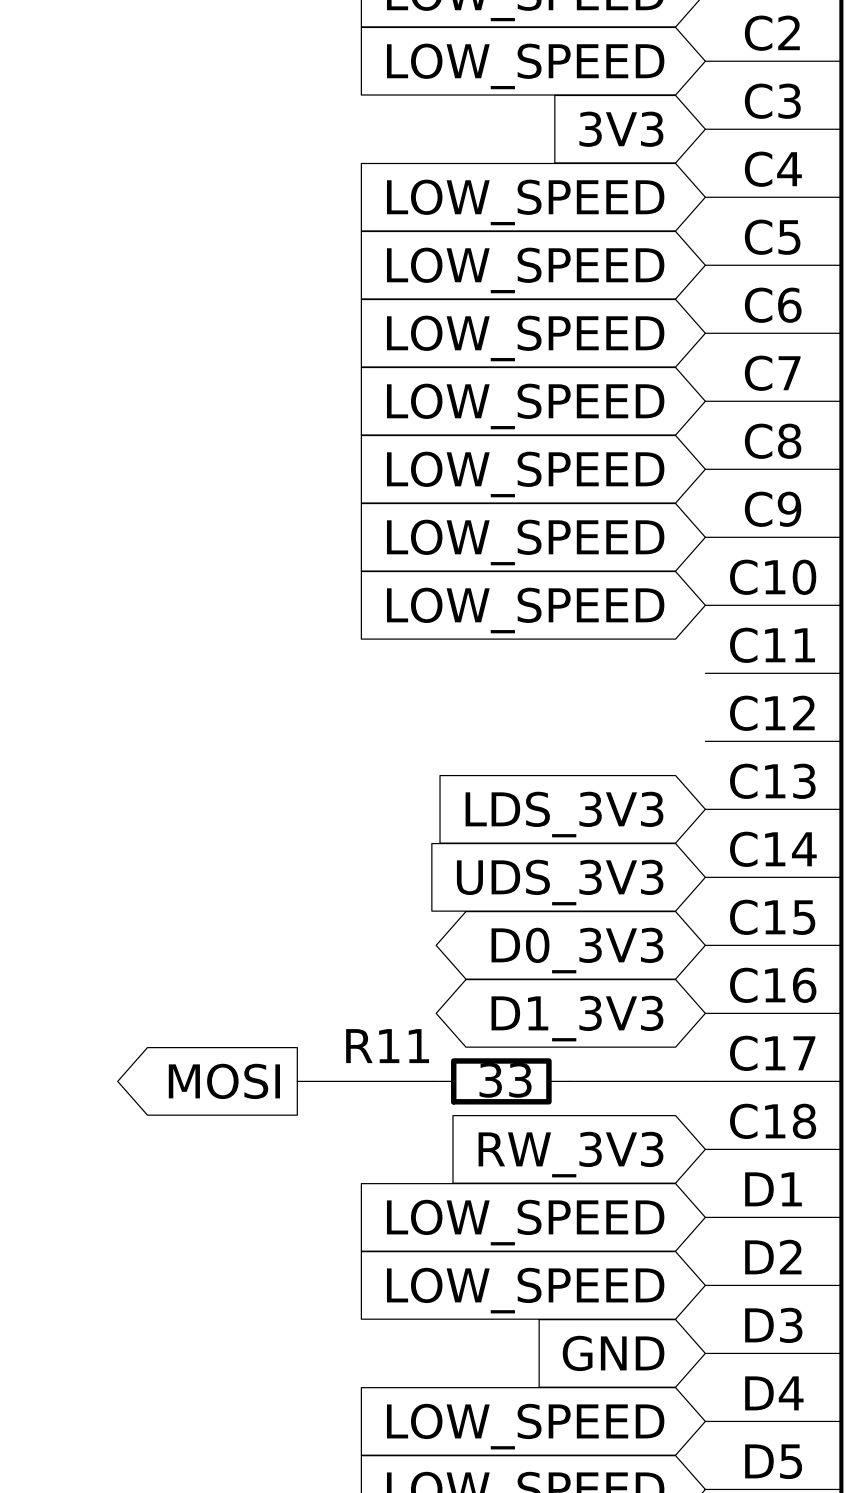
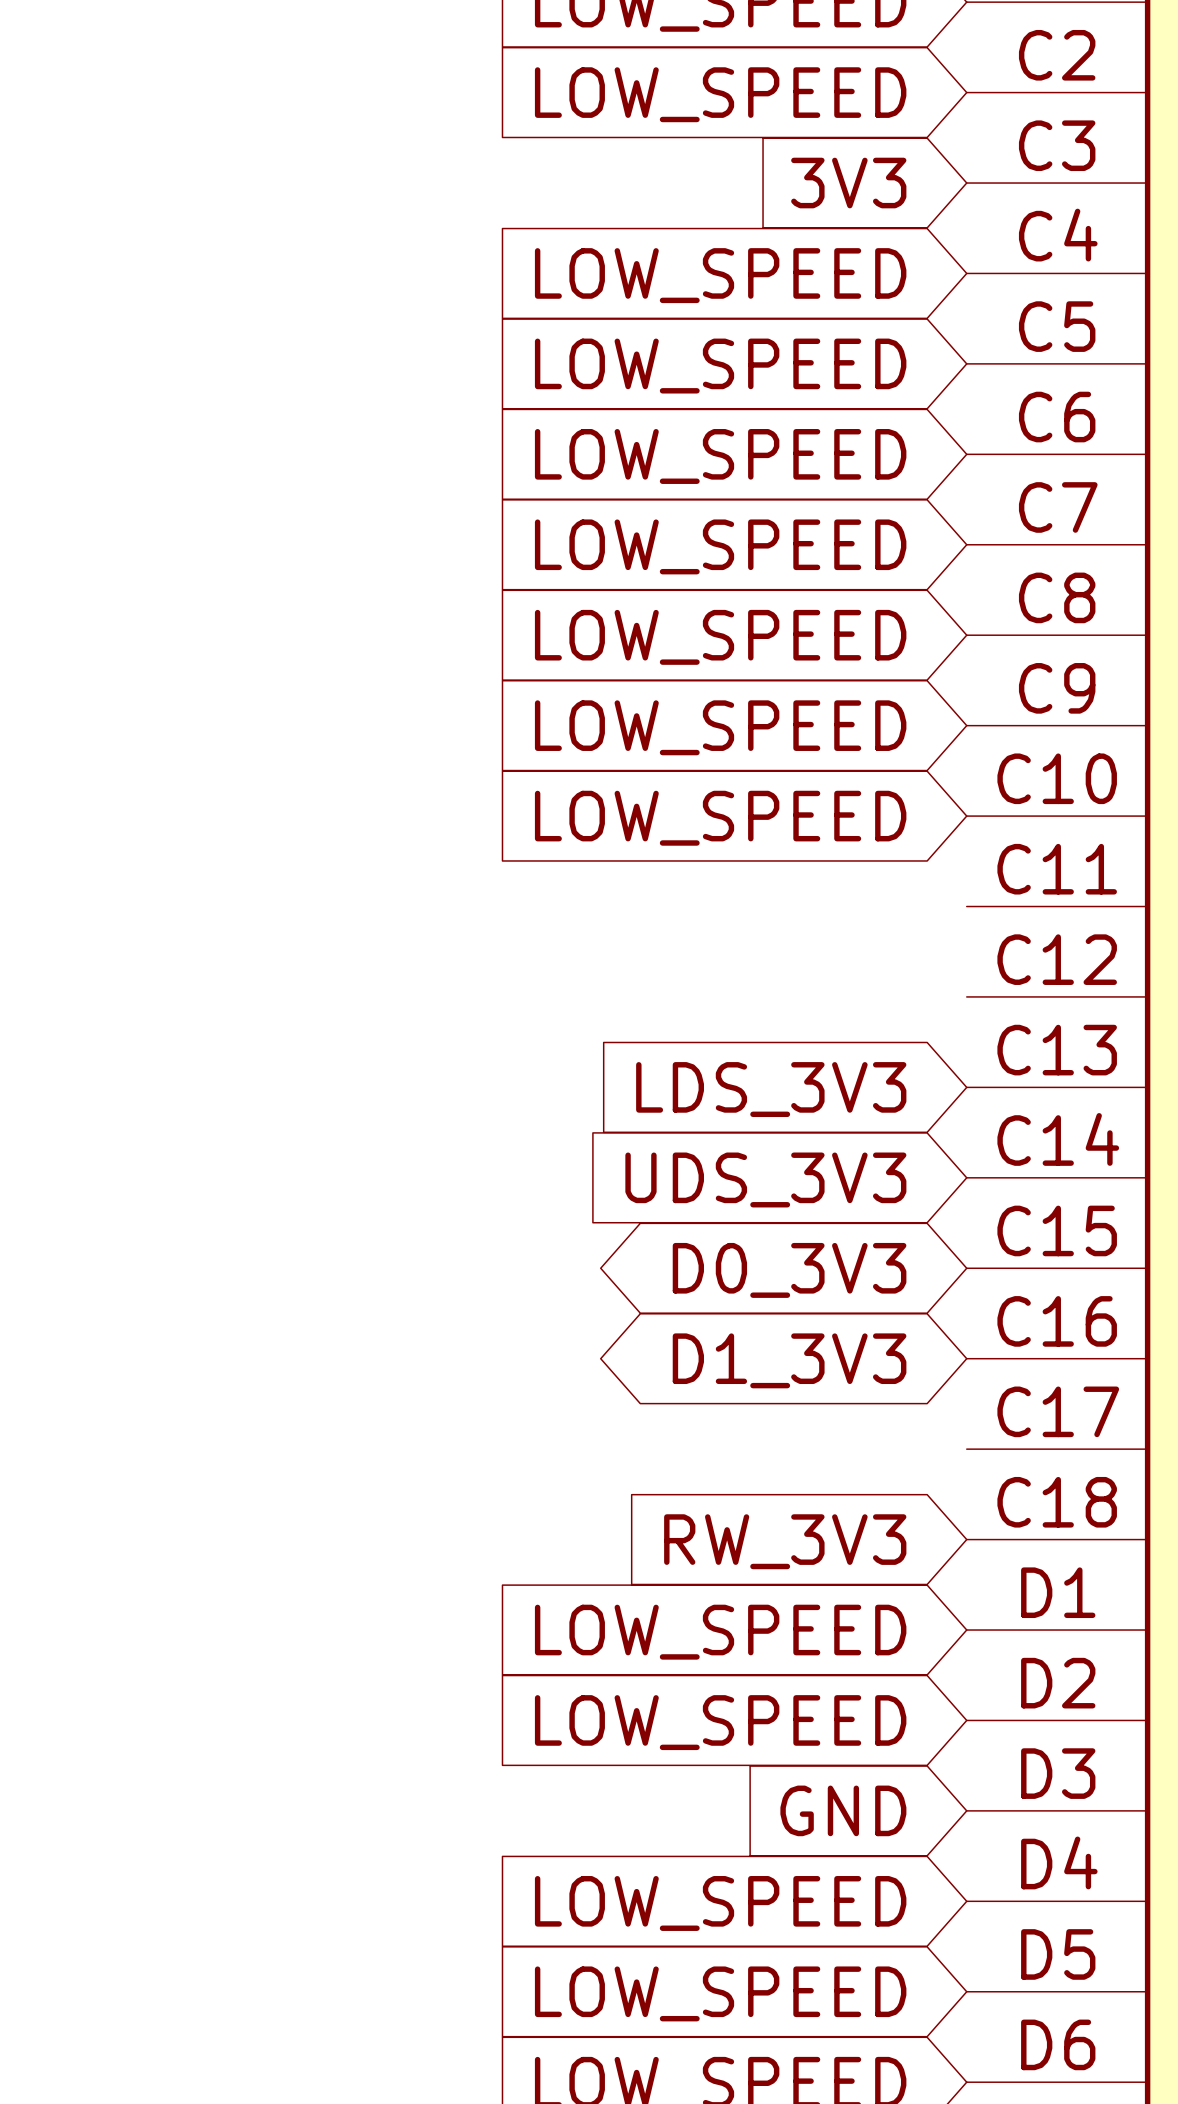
global label: MOSI (224, 1081) -> none
wire: (297, 1081) (433, 1081) -> none
R11: 33 (501, 1081) -> none
wire: (569, 1081) (705, 1081) -> none

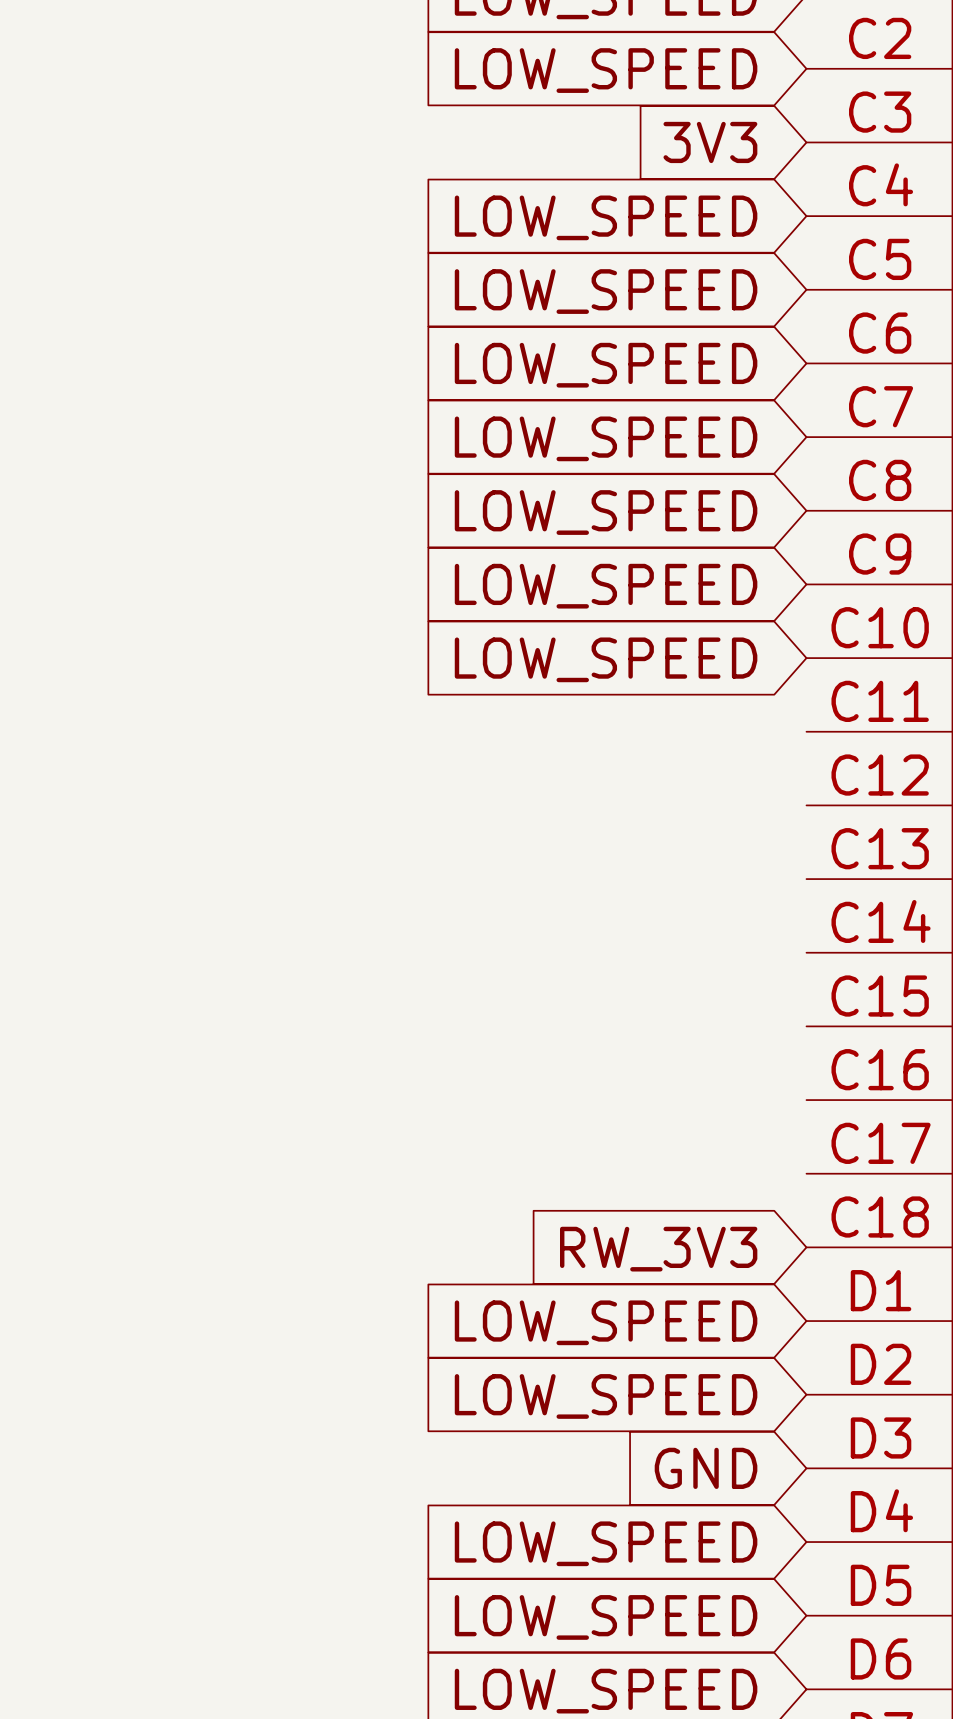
global label: LDS_3V3 (771, 1089) -> none
global label: UDS_3V3 (765, 1179) -> none
global label: D0_3V3 (789, 1270) -> none
global label: D1_3V3 (789, 1360) -> none

